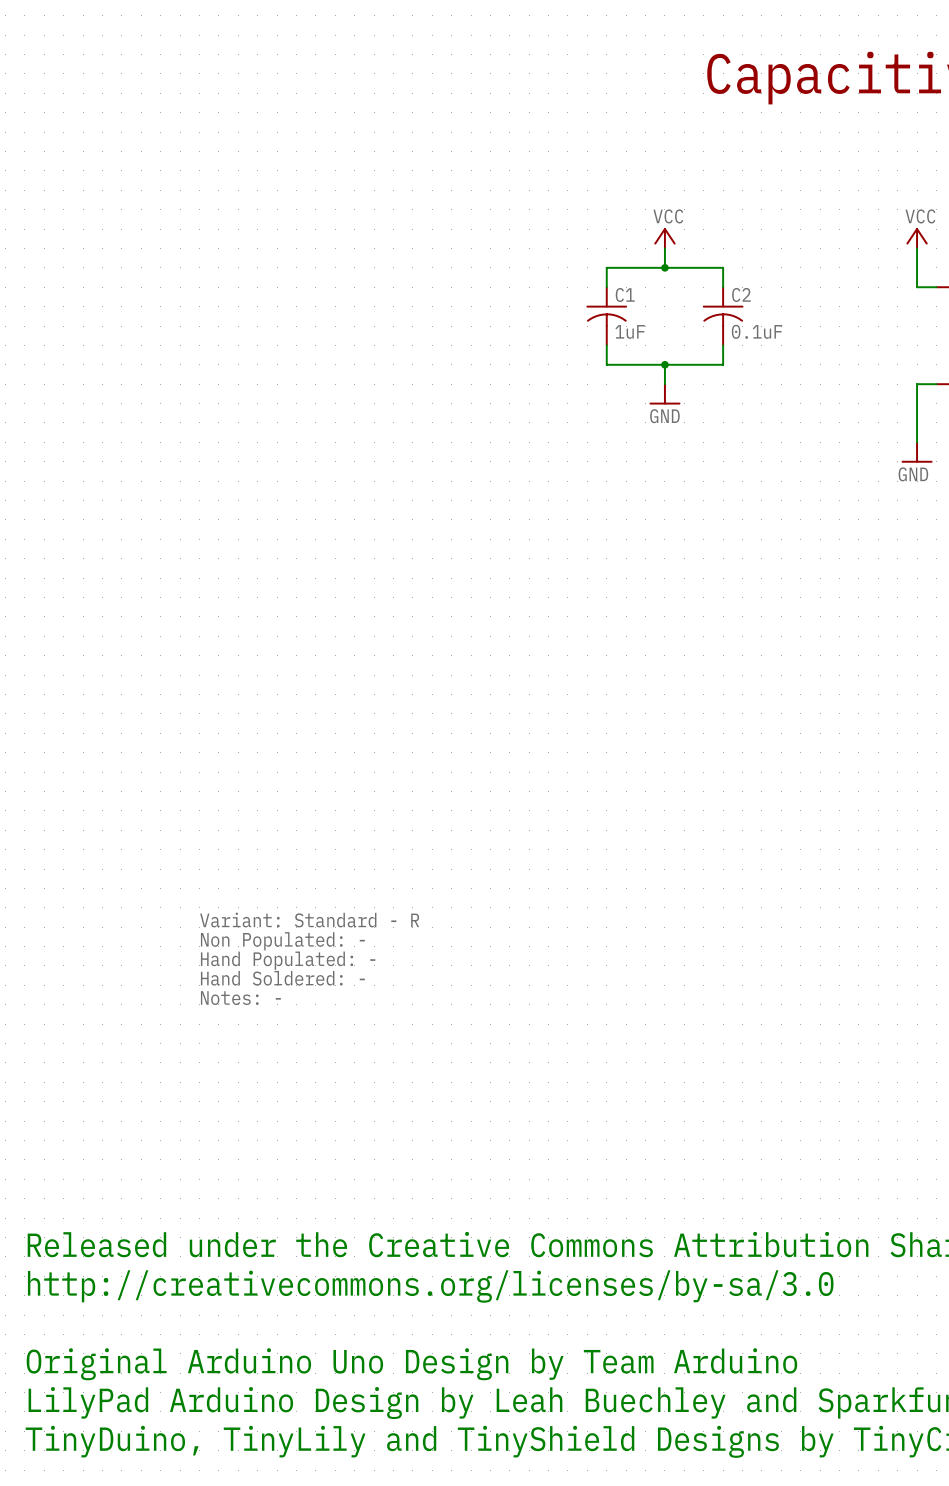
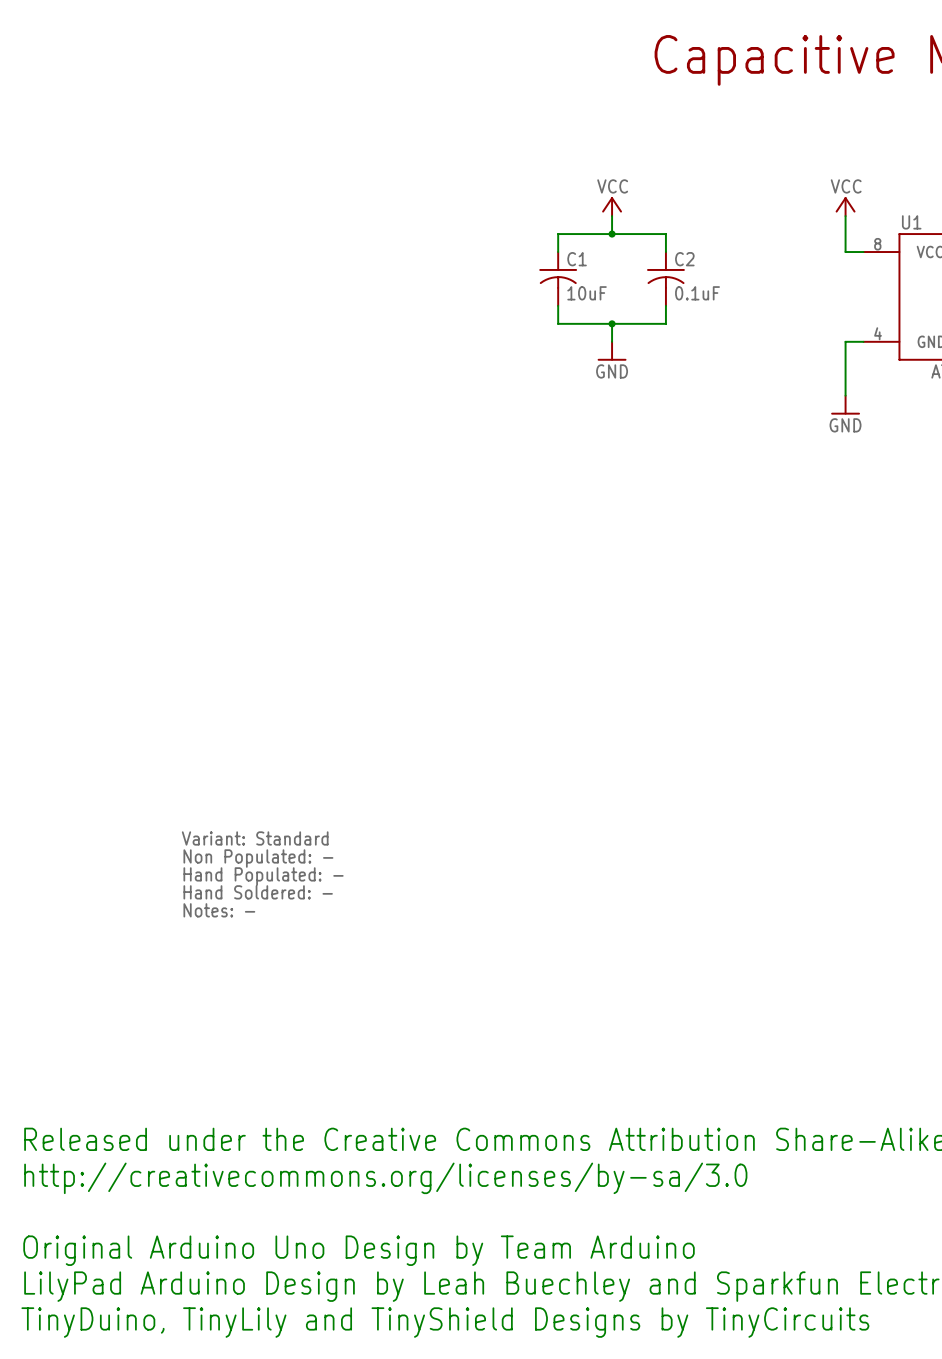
C1 value: 1uF (630, 331) -> 10uF (587, 293)
text: Variant: Standard - R (309, 920) -> Variant: Standard (255, 838)

